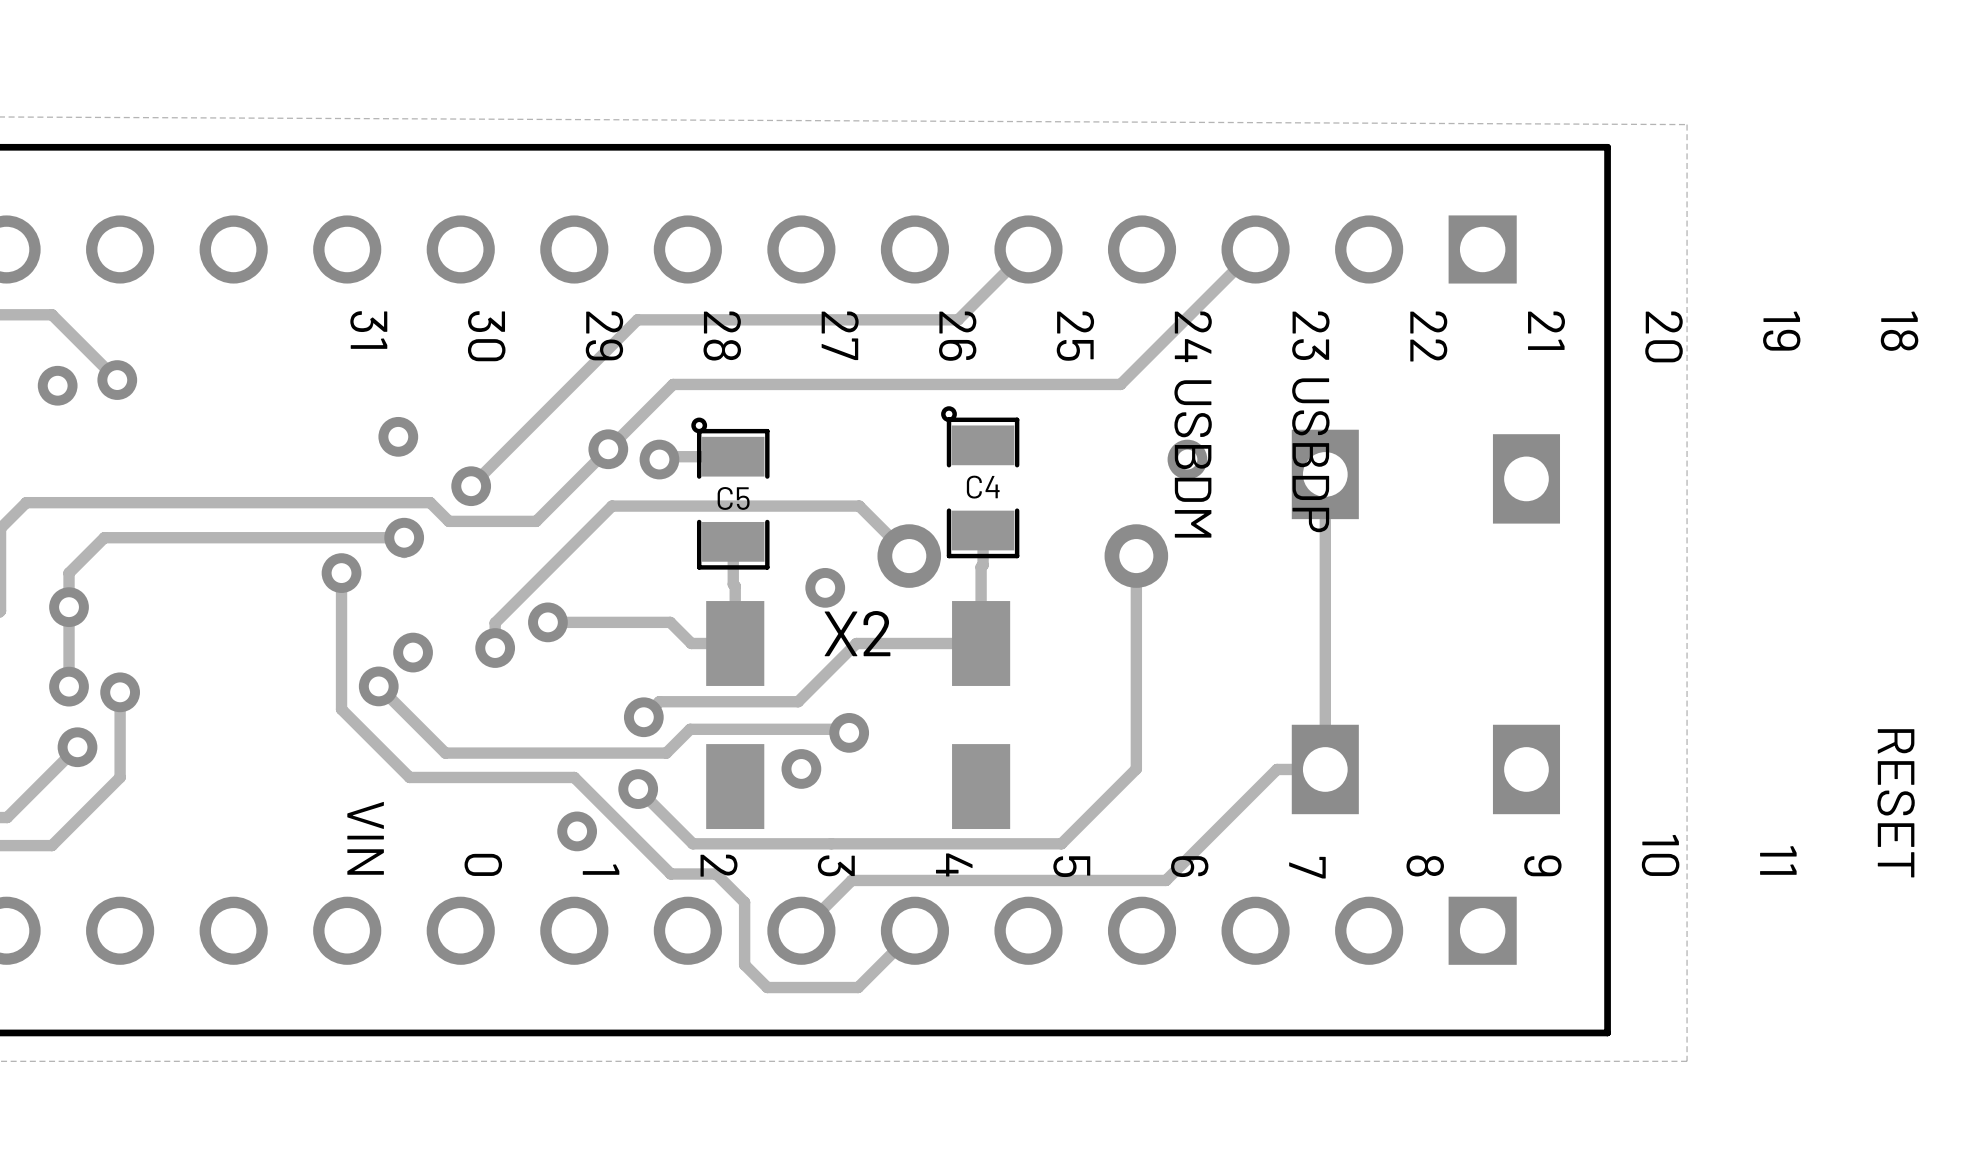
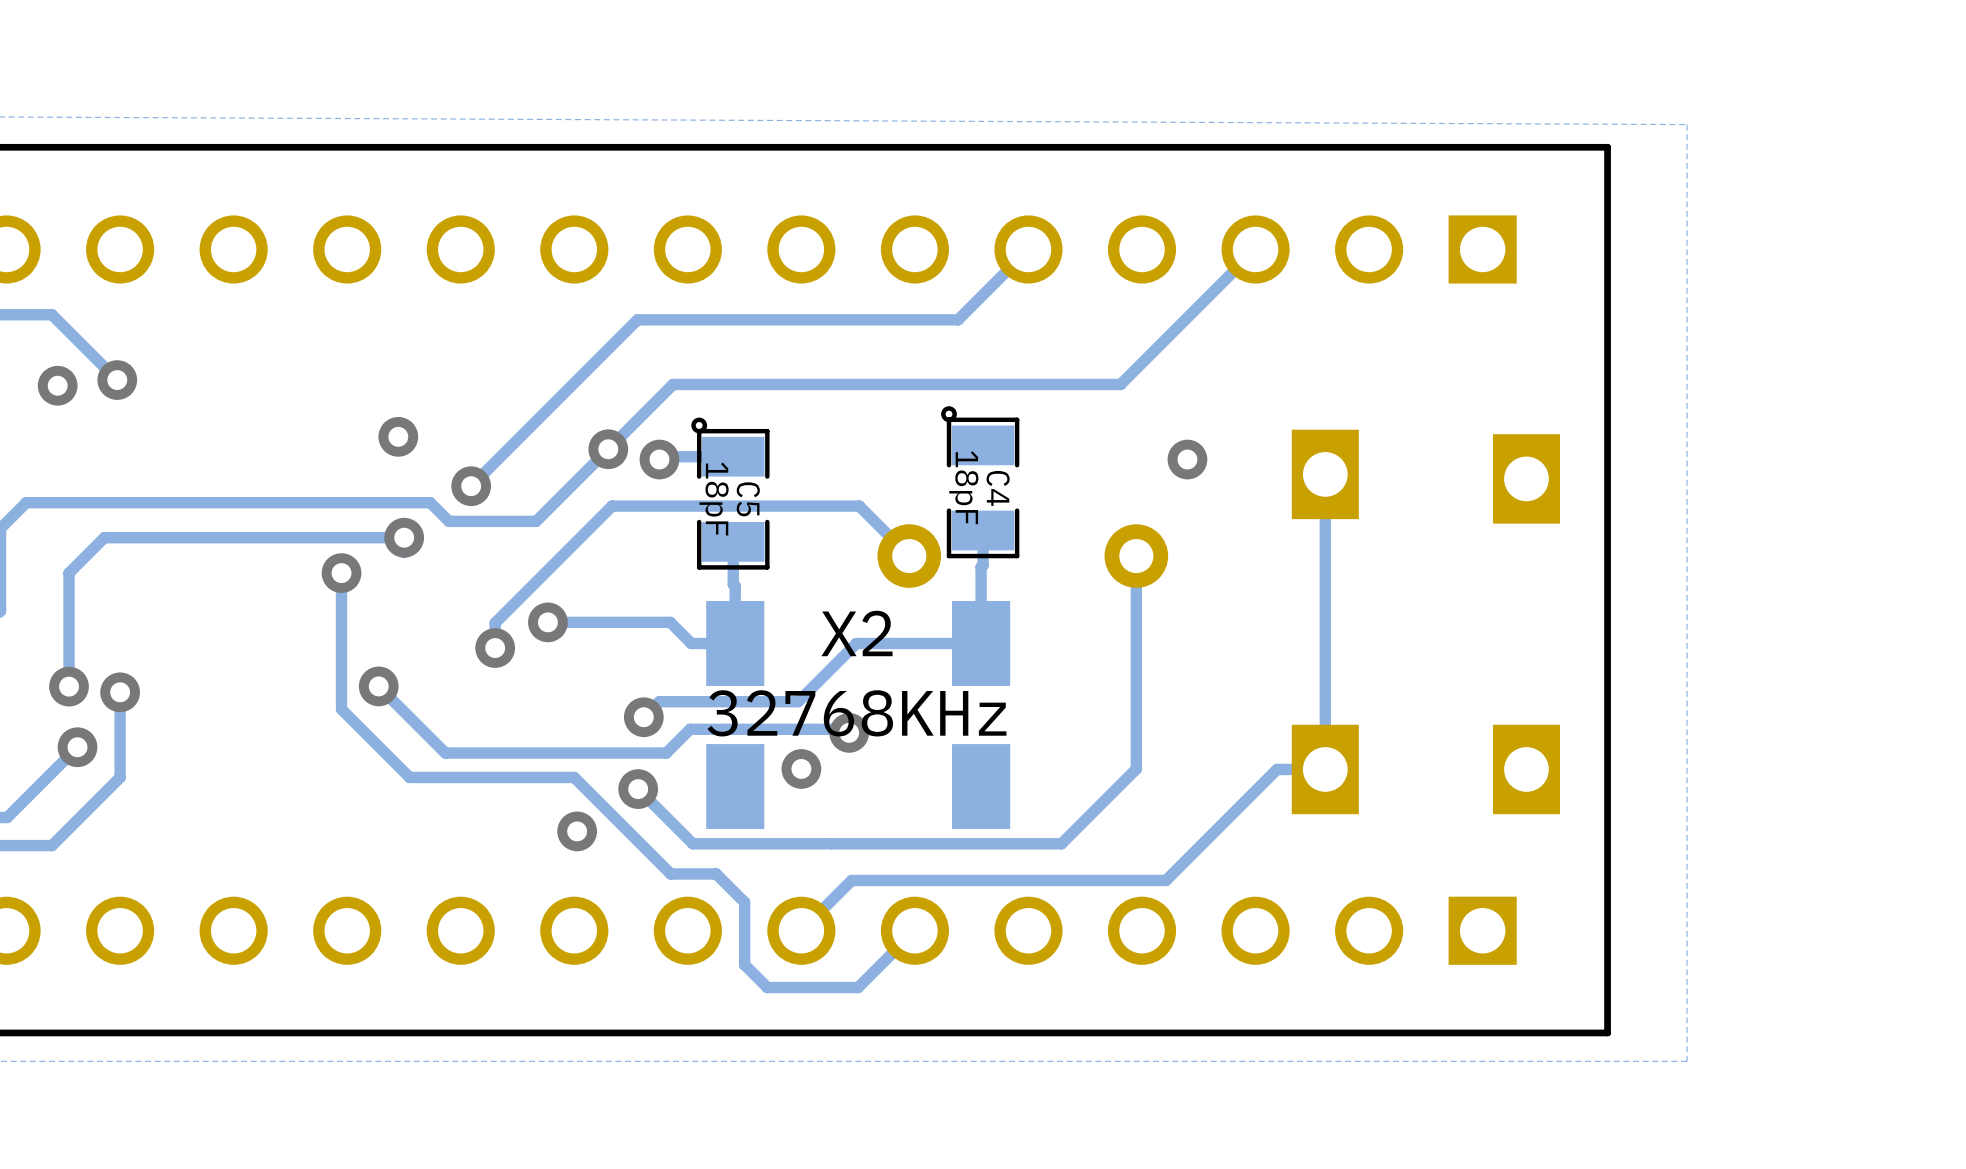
text: 31 (368, 329) -> none
text: 21 (1546, 330) -> none
text: 19 (1781, 331) -> none
text: 18 (1899, 331) -> none
text: 29 (604, 335) -> none
text: 27 (840, 335) -> none
text: 30 (486, 336) -> none
text: 28 (722, 336) -> none
text: 26 (957, 336) -> none
text: 25 (1075, 336) -> none
text: 22 (1428, 336) -> none
text: 20 (1664, 336) -> none
text: 23 USBDP (1310, 421) -> none
text: 24 USBDM (1193, 424) -> none
C4 name rotation: 0° (983, 487) -> 90° clockwise (998, 488)
C4 value: none -> 18pF (963, 487)
C5 name rotation: 0° (733, 498) -> 90° clockwise (748, 499)
C5 value: none -> 18pF (714, 499)
via: (825, 587) -> none
via: (69, 607) -> none
via: (413, 652) -> none
X2 value: none -> 32768KHz (856, 713)
text: RESET (1896, 803) -> none
text: VIN (365, 838) -> none
text: 10 (1660, 855) -> none
text: 11 (1778, 860) -> none
text: 0 (483, 864) -> none
text: 4 (954, 864) -> none
text: 2 (719, 865) -> none
text: 3 (836, 865) -> none
text: 9 (1542, 865) -> none
text: 5 (1071, 866) -> none
text: 6 (1189, 866) -> none
text: 8 (1425, 866) -> none
text: 7 (1307, 867) -> none
text: 1 (601, 869) -> none

